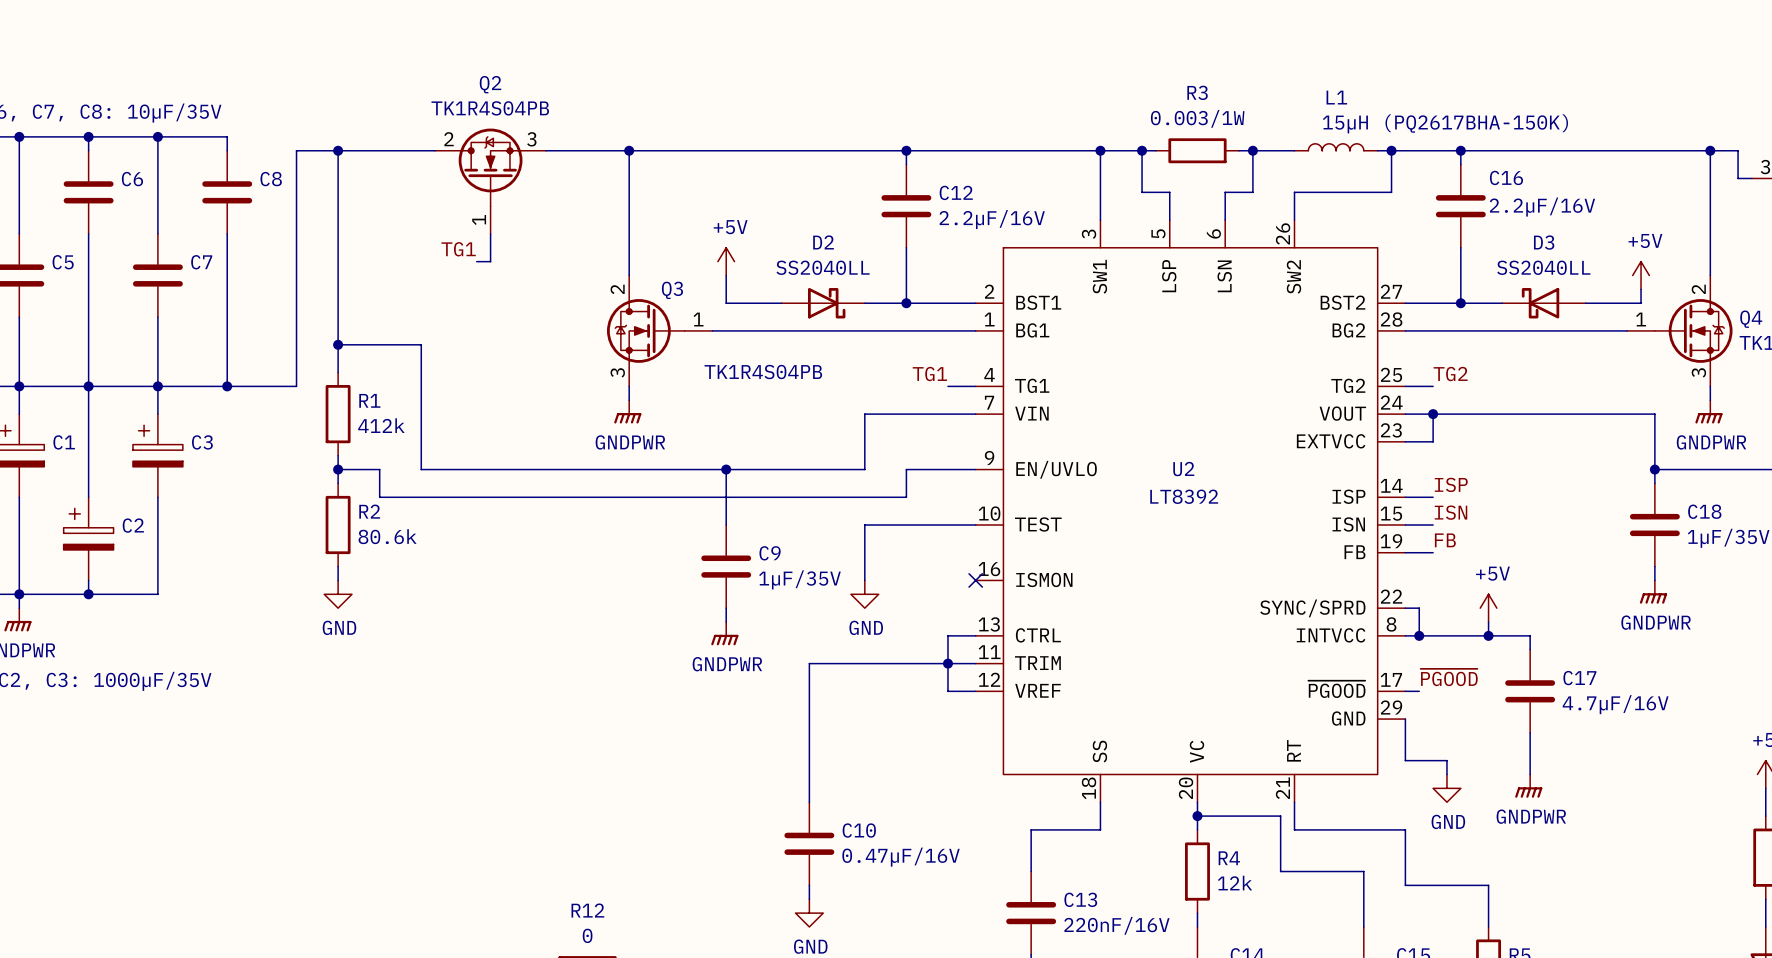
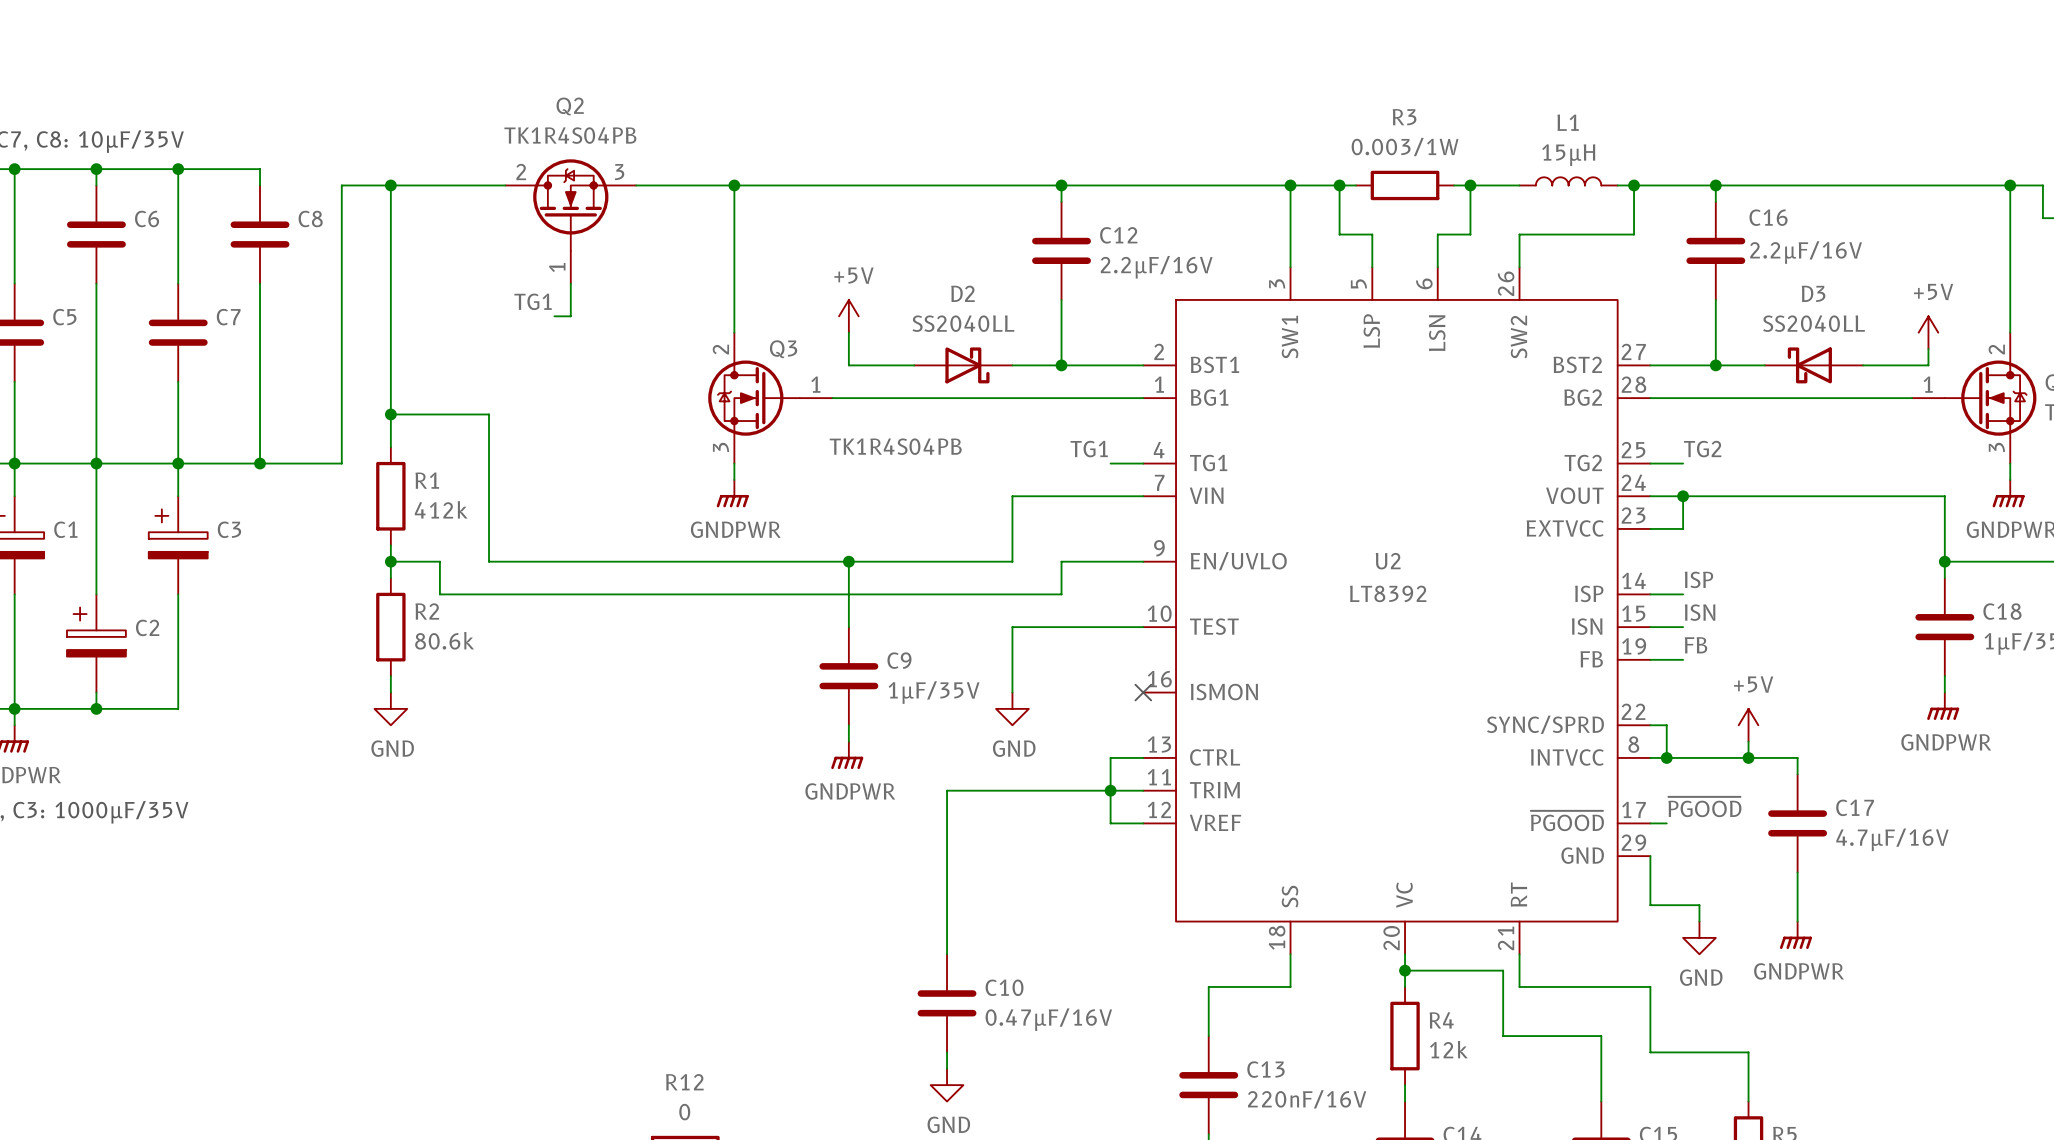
L1 value: 15µH (PQ2617BHA-150K) (1445, 123) -> 15µH (1568, 155)

